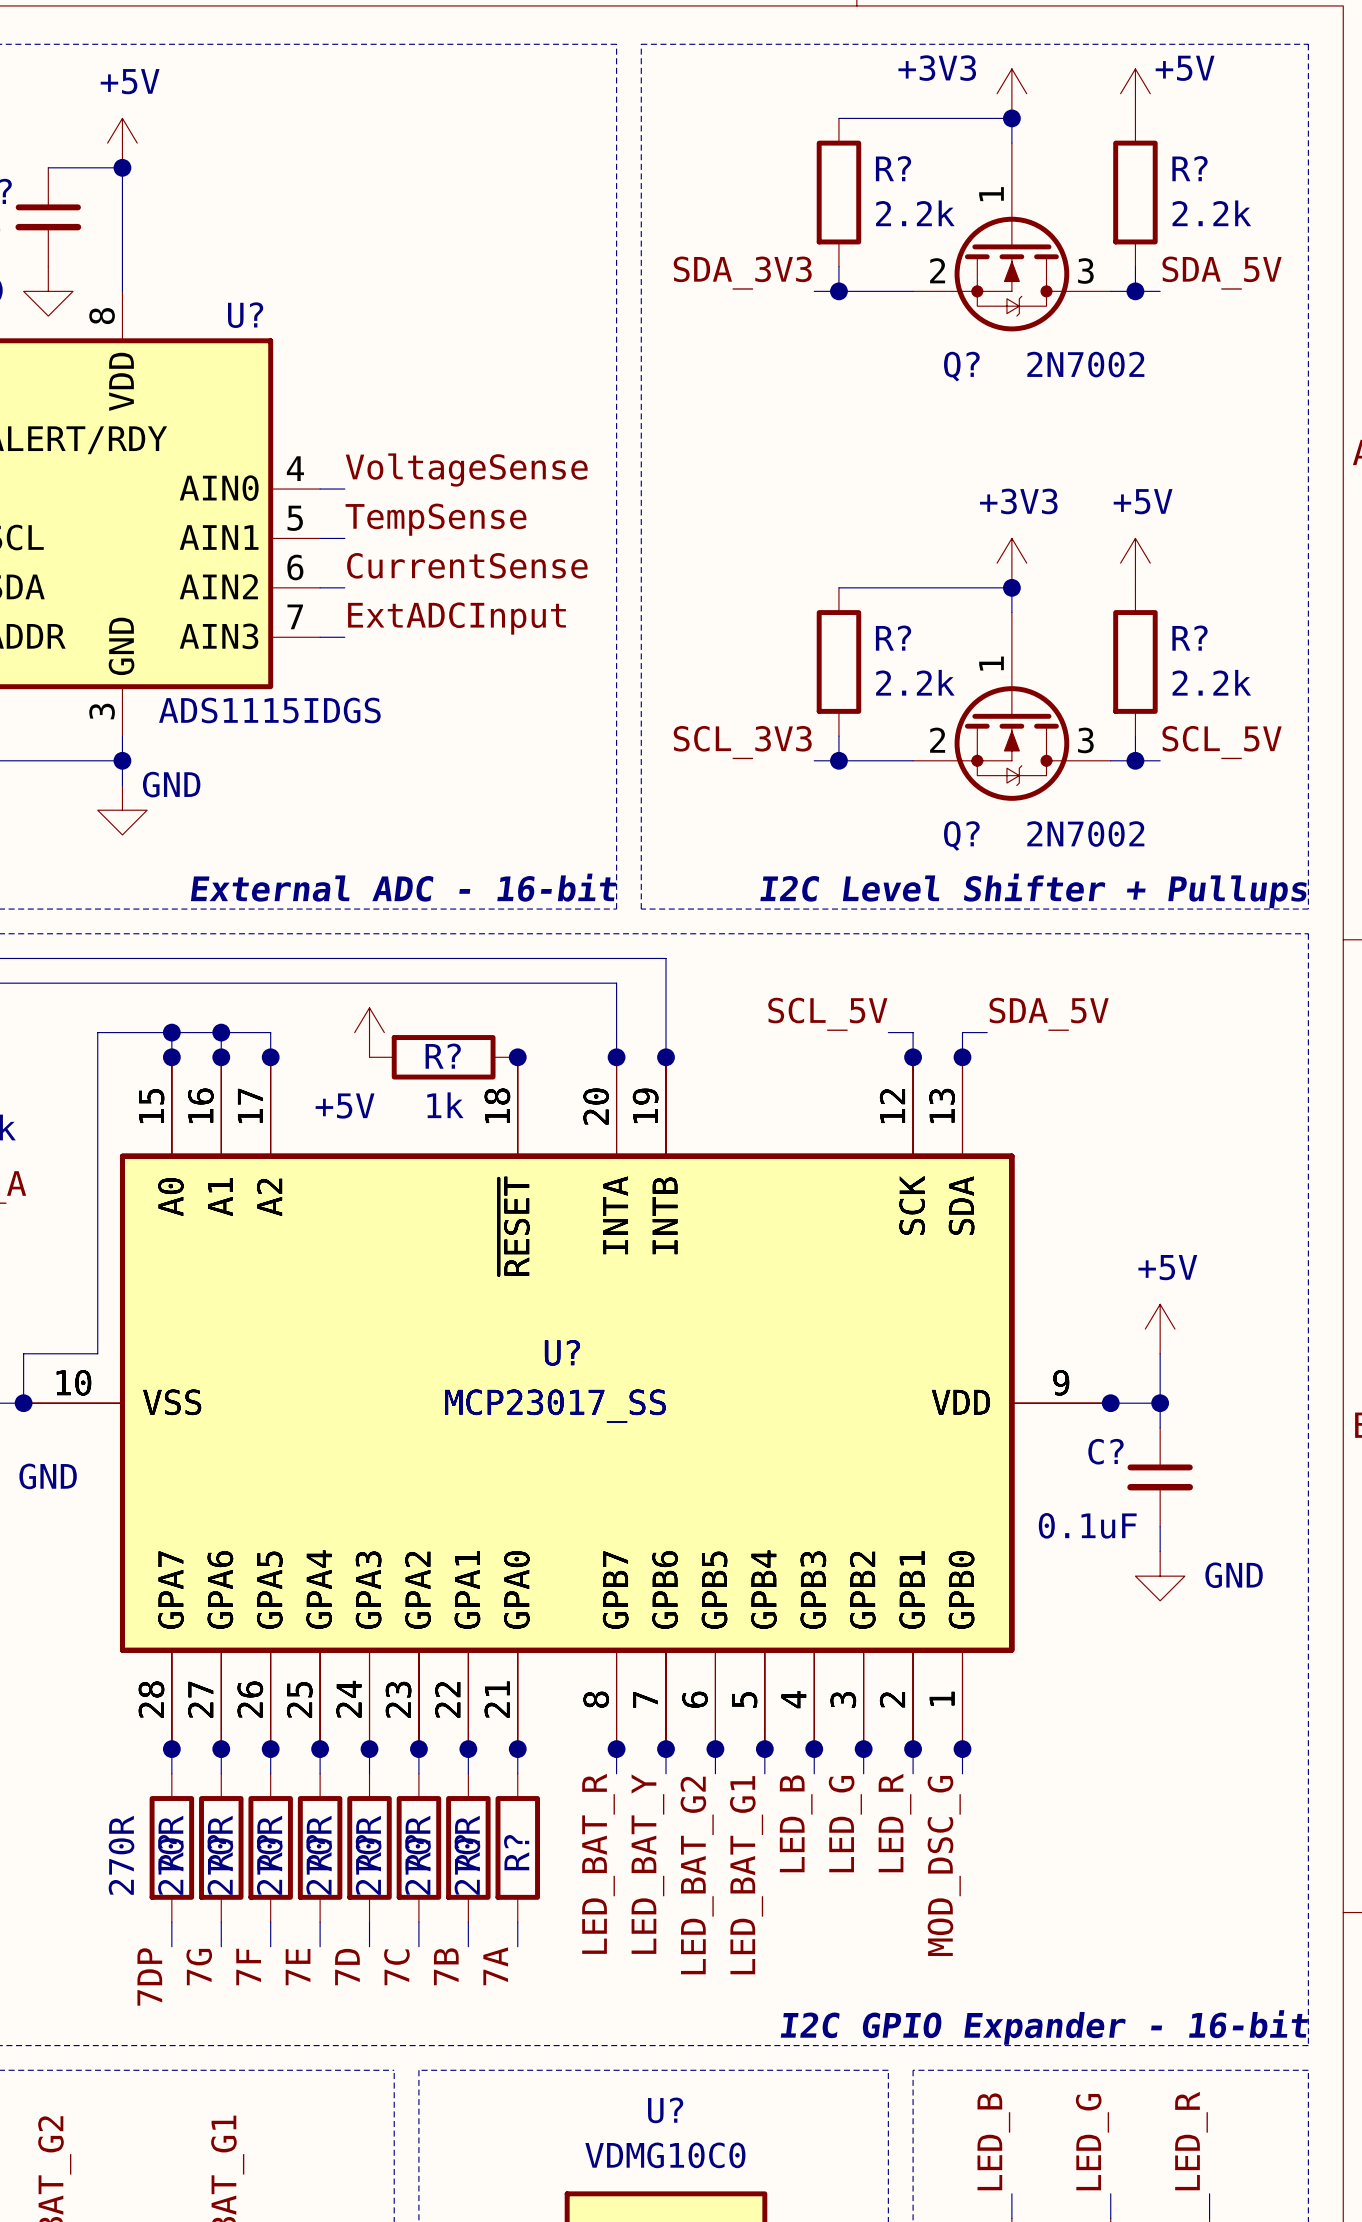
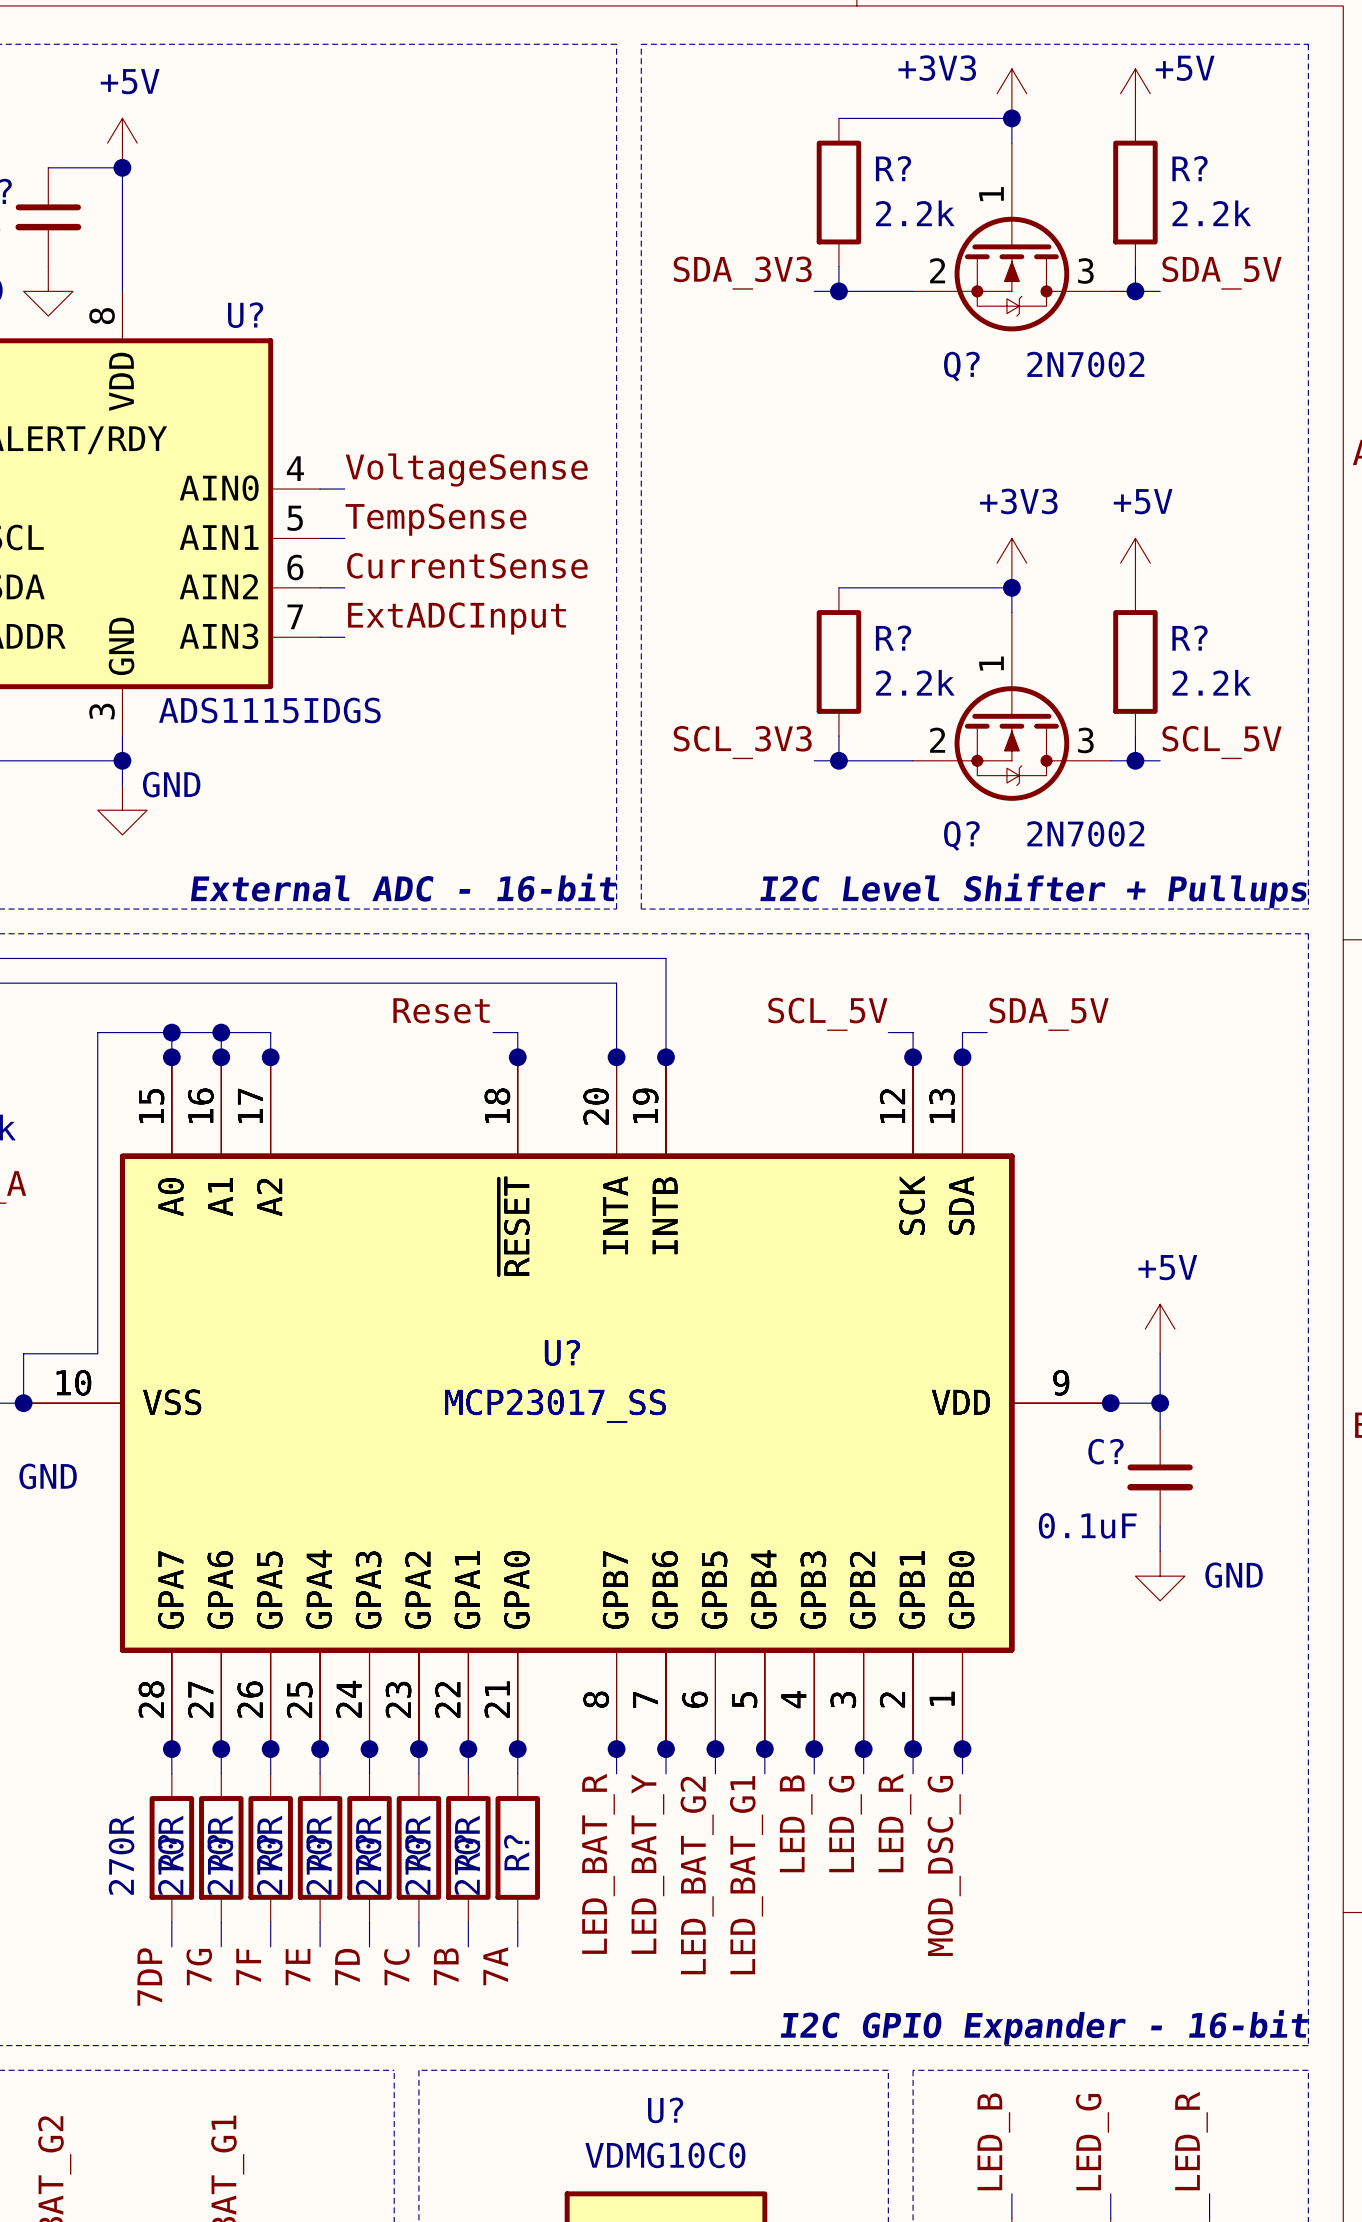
label: none -> Reset (441, 1010)
power symbol: +5V (369, 1032) -> none
wire: none -> (493, 1032) (517, 1032) (517, 1057)
R?: 1k (443, 1057) -> none

